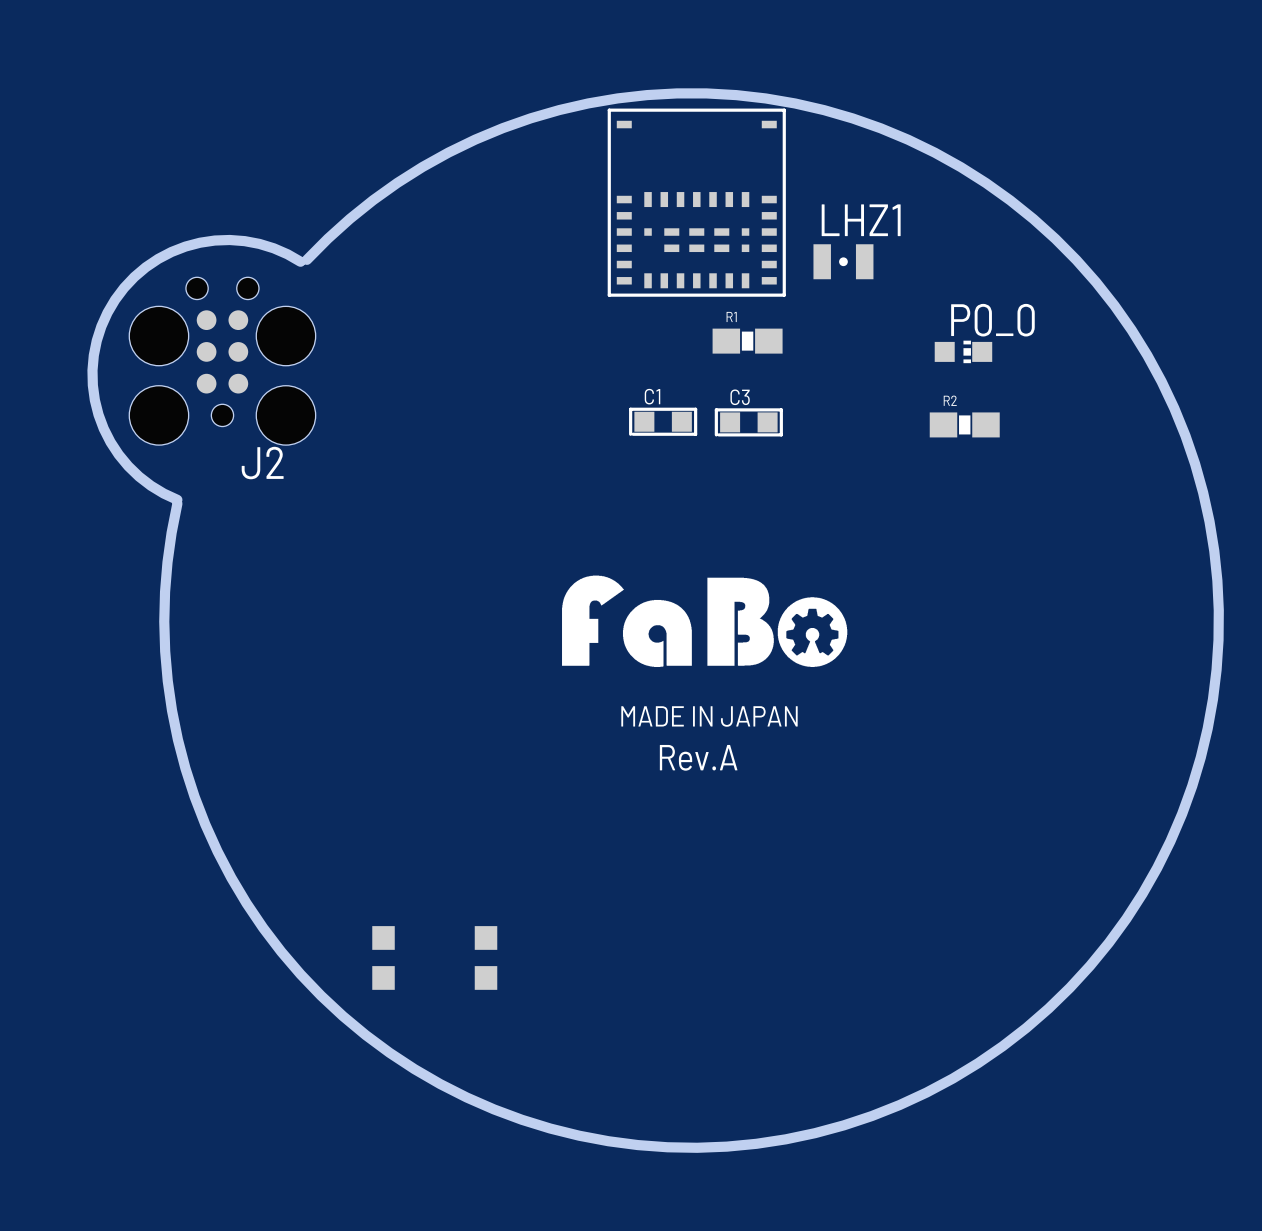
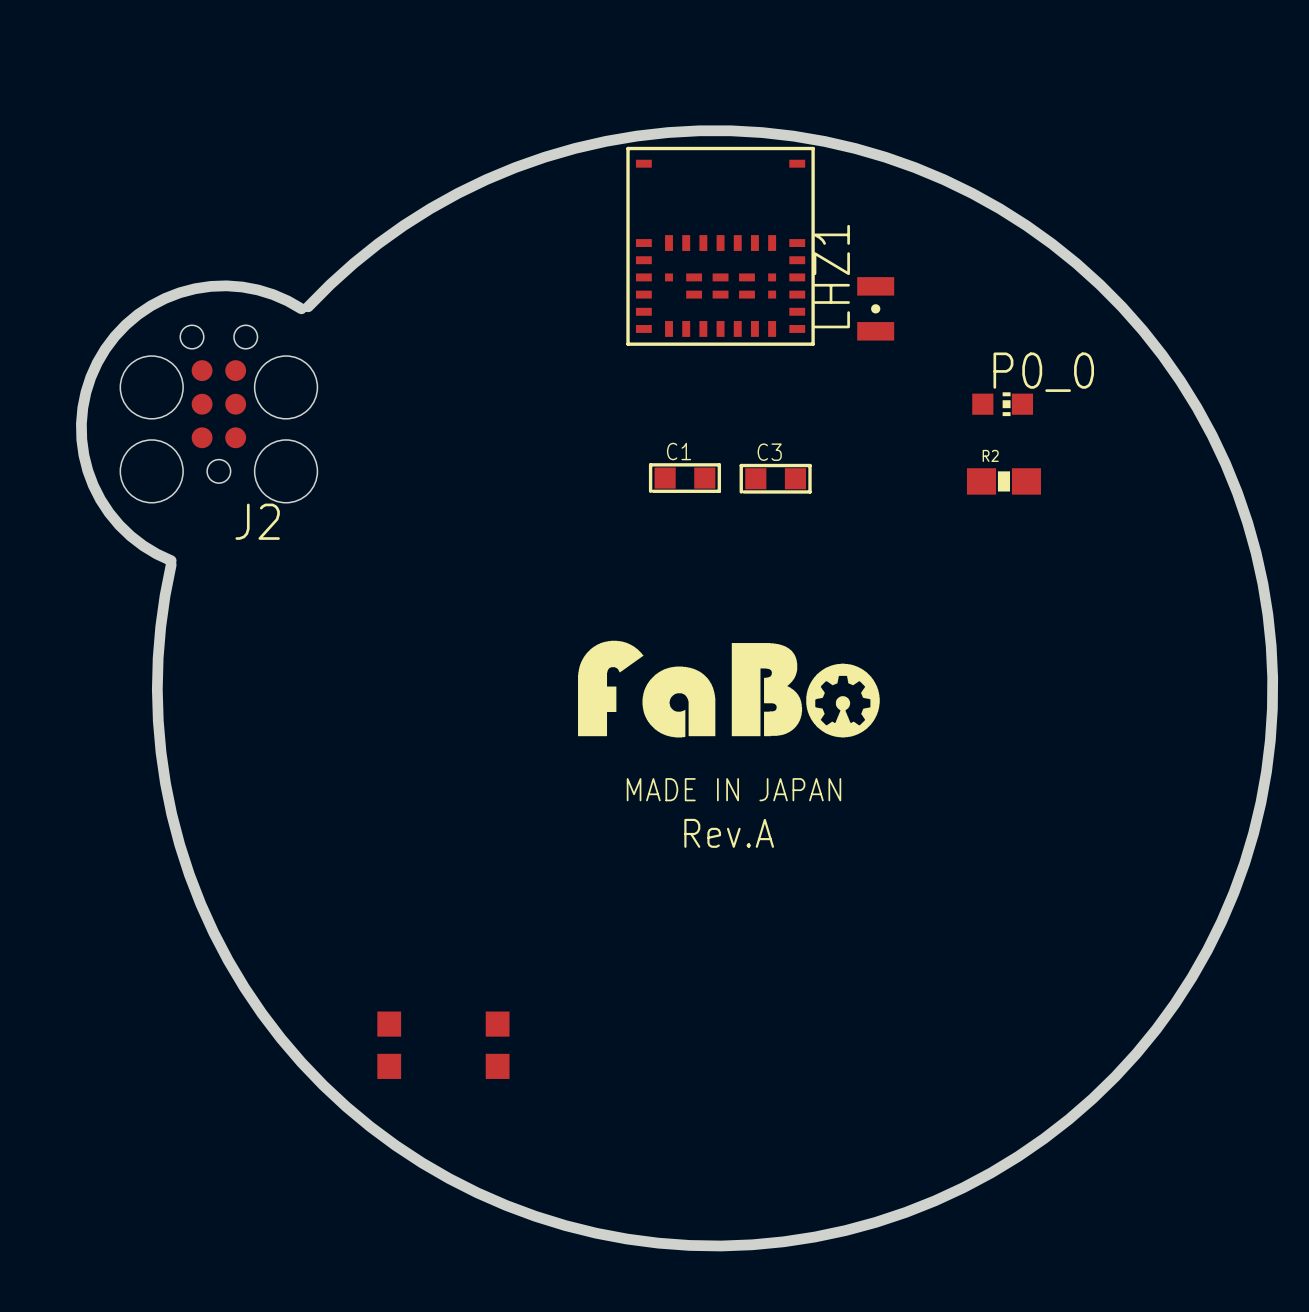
LHZ1 name position: LHZ1 (861, 220) -> LHZ1 (831, 276)
LHZ1 rotation: 0° (843, 261) -> 90° clockwise (875, 308)
R1: (747, 341) -> none

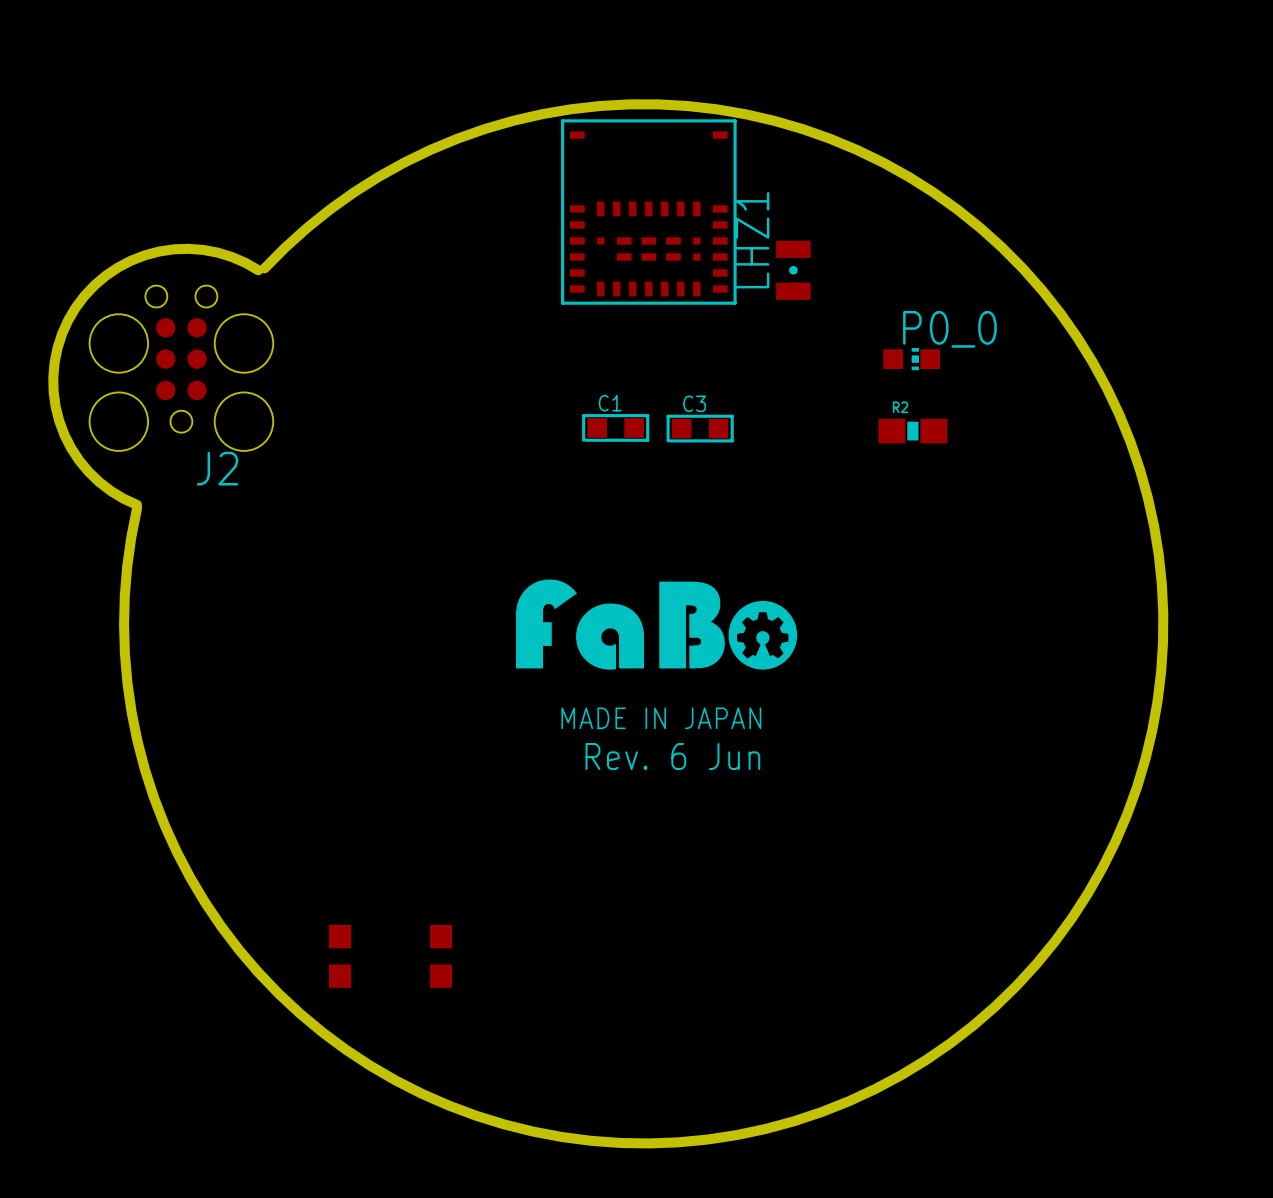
text: none -> Rev. 6 Jun (672, 756)
text: Rev.A (729, 833) -> none

